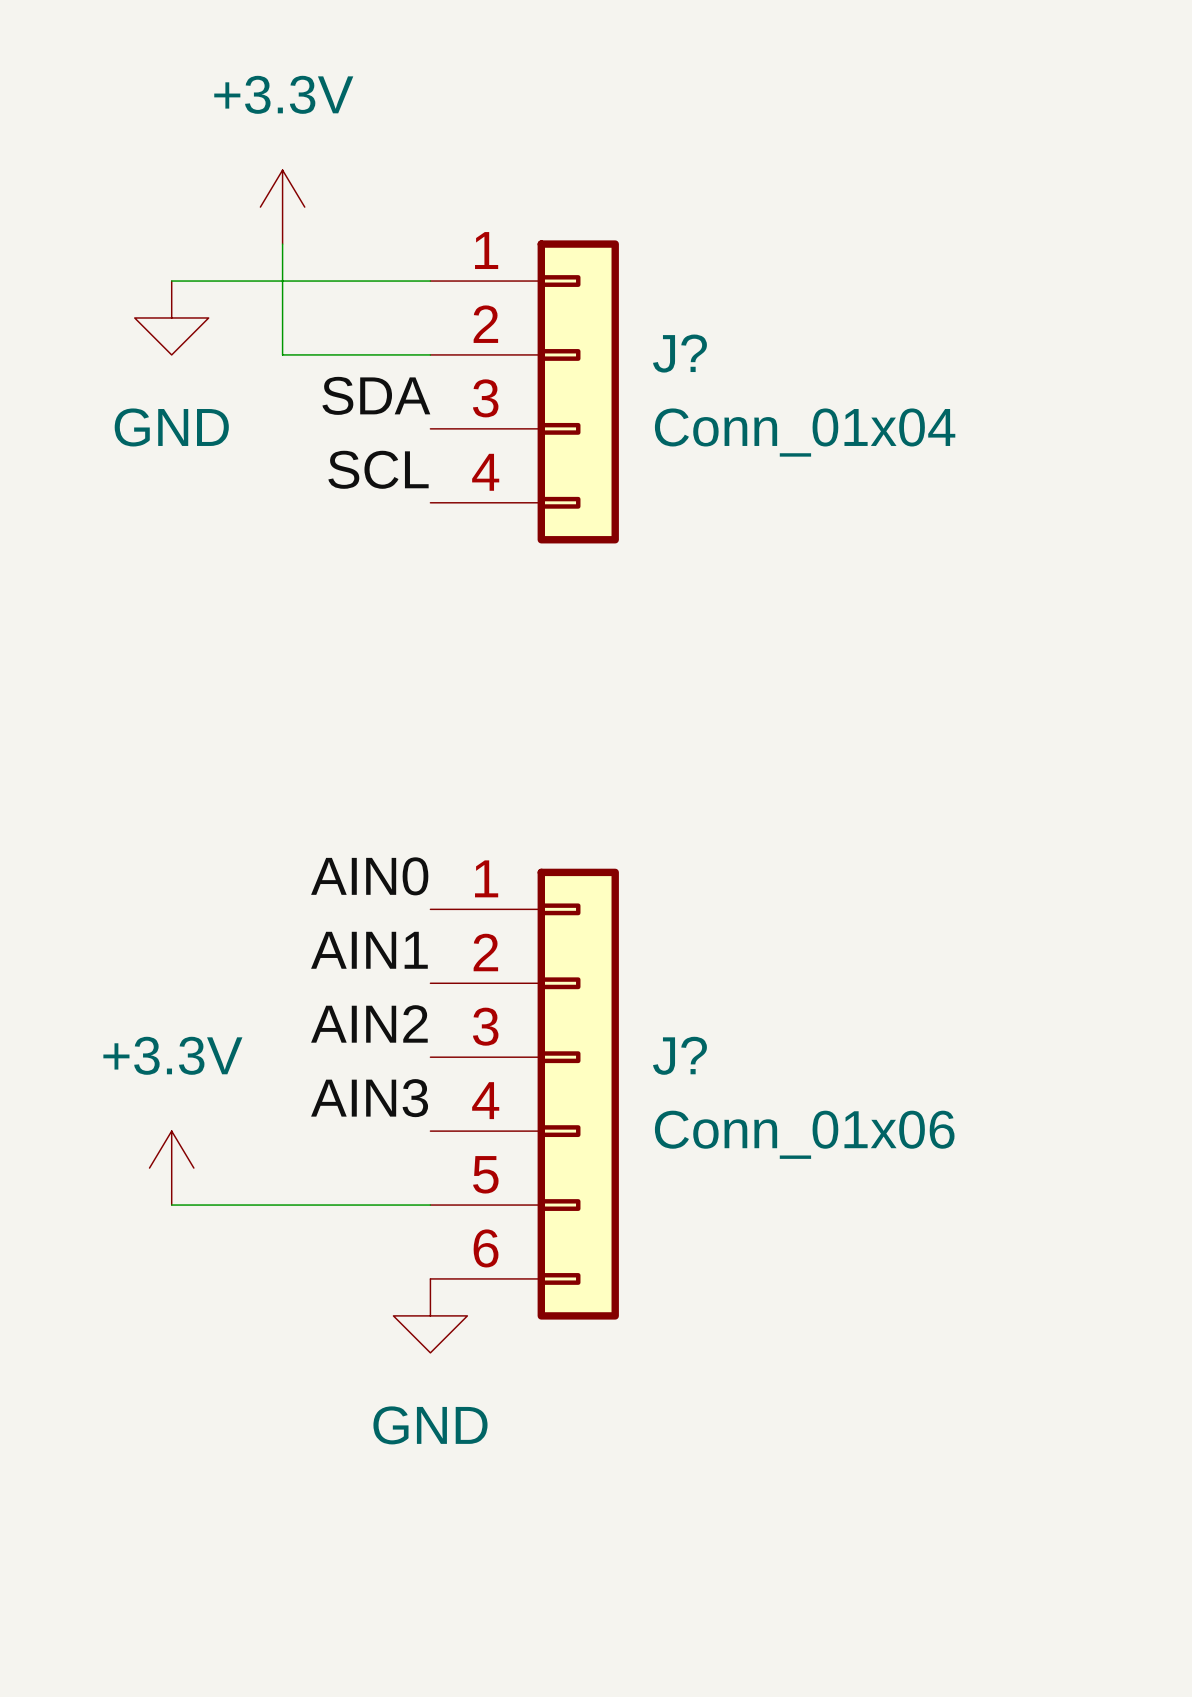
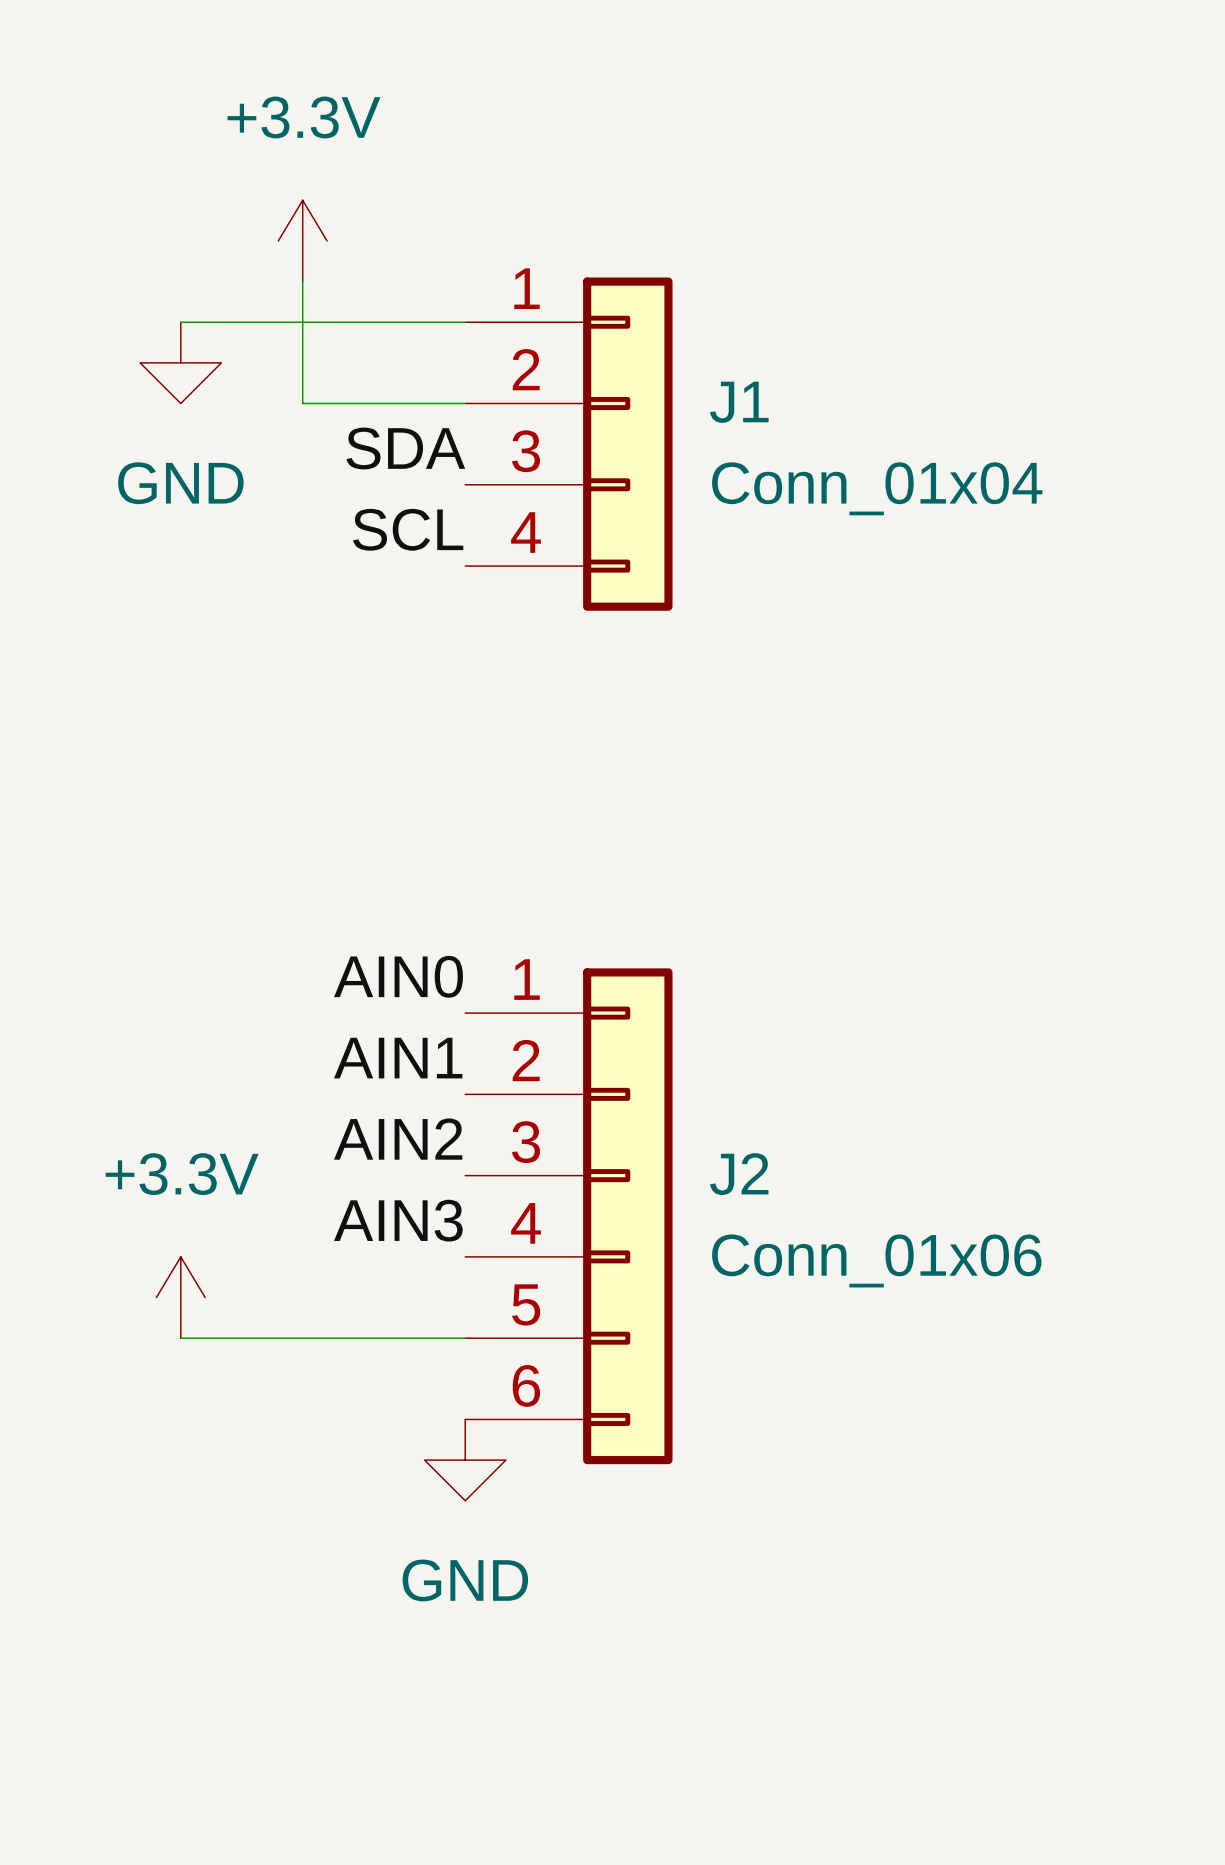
J? name: J? (679, 353) -> J1 (739, 402)
J? name: J? (679, 1055) -> J2 (739, 1174)

